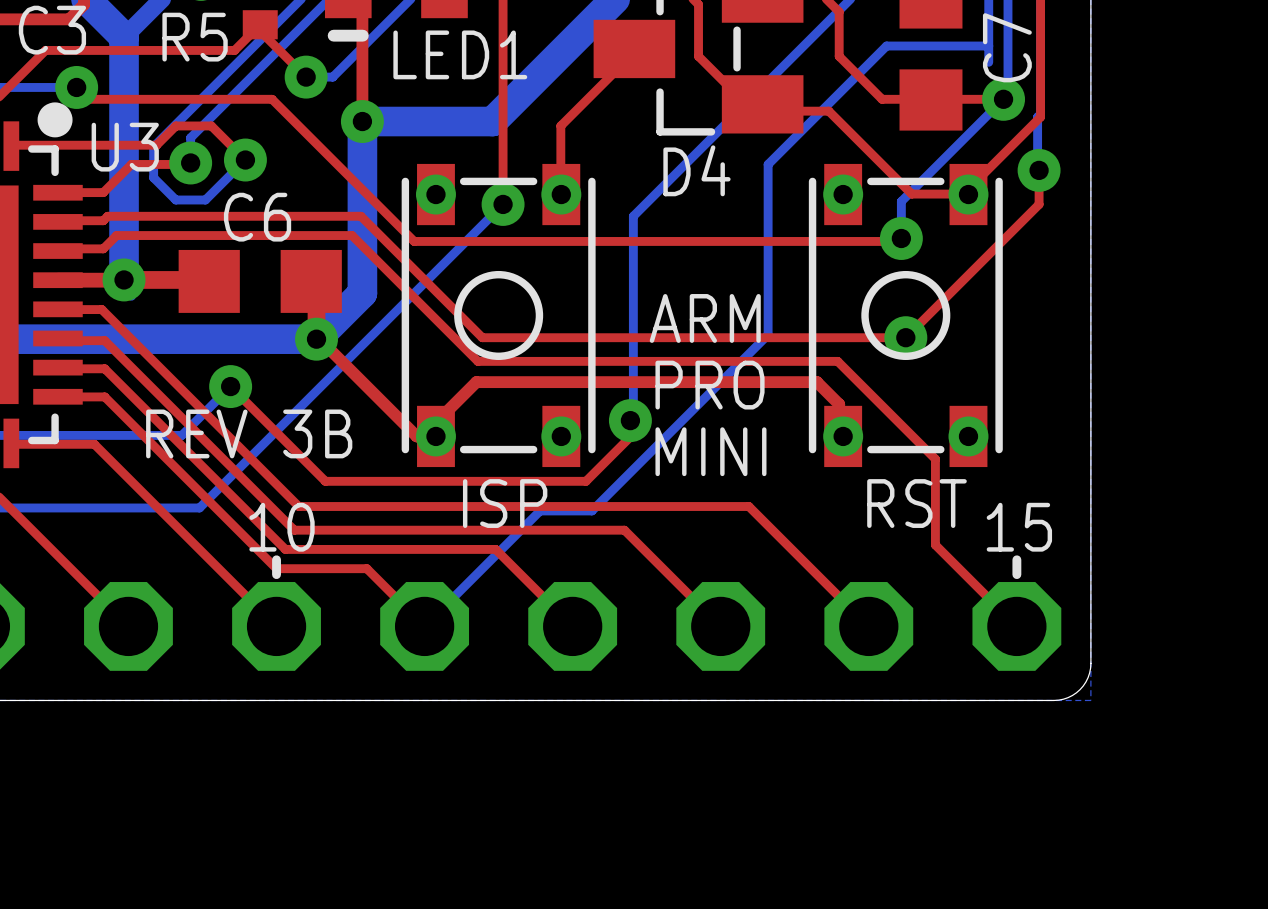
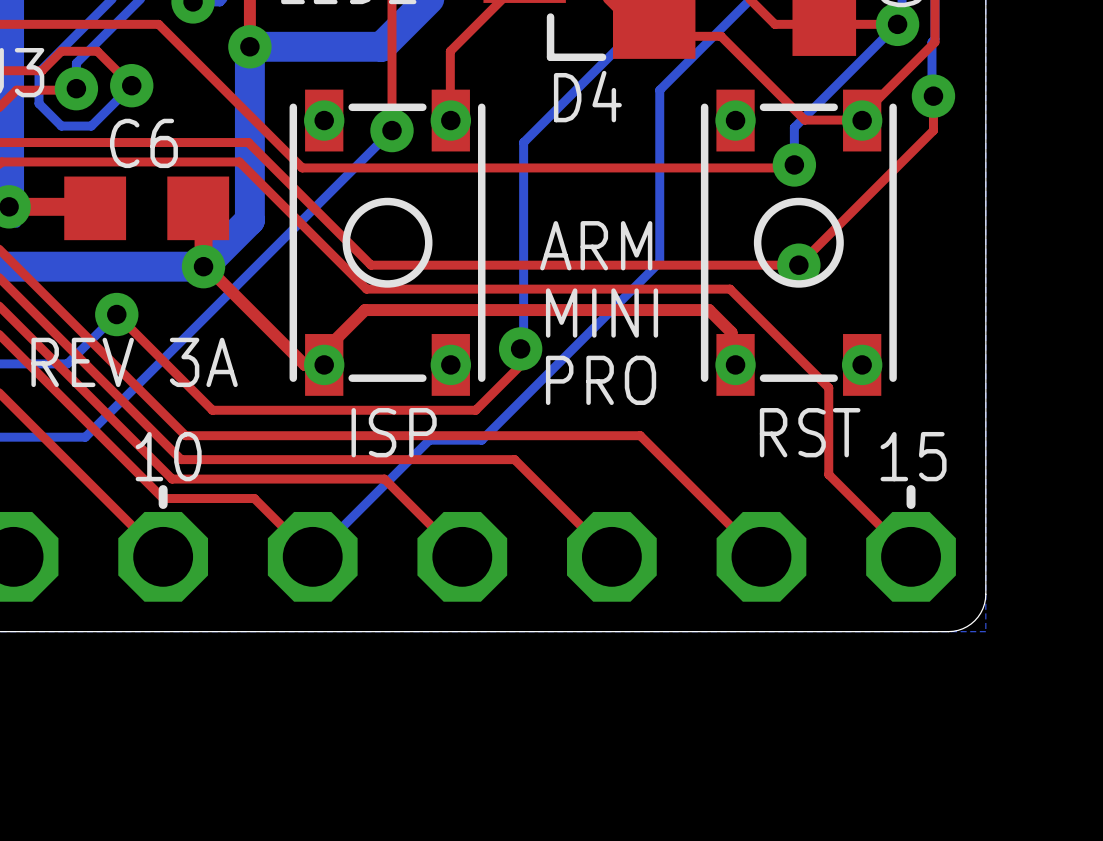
text: PRO (710, 385) -> MINI (602, 313)
text: REV 3B (249, 433) -> REV 3A (134, 362)
text: MINI (710, 451) -> PRO (601, 380)

